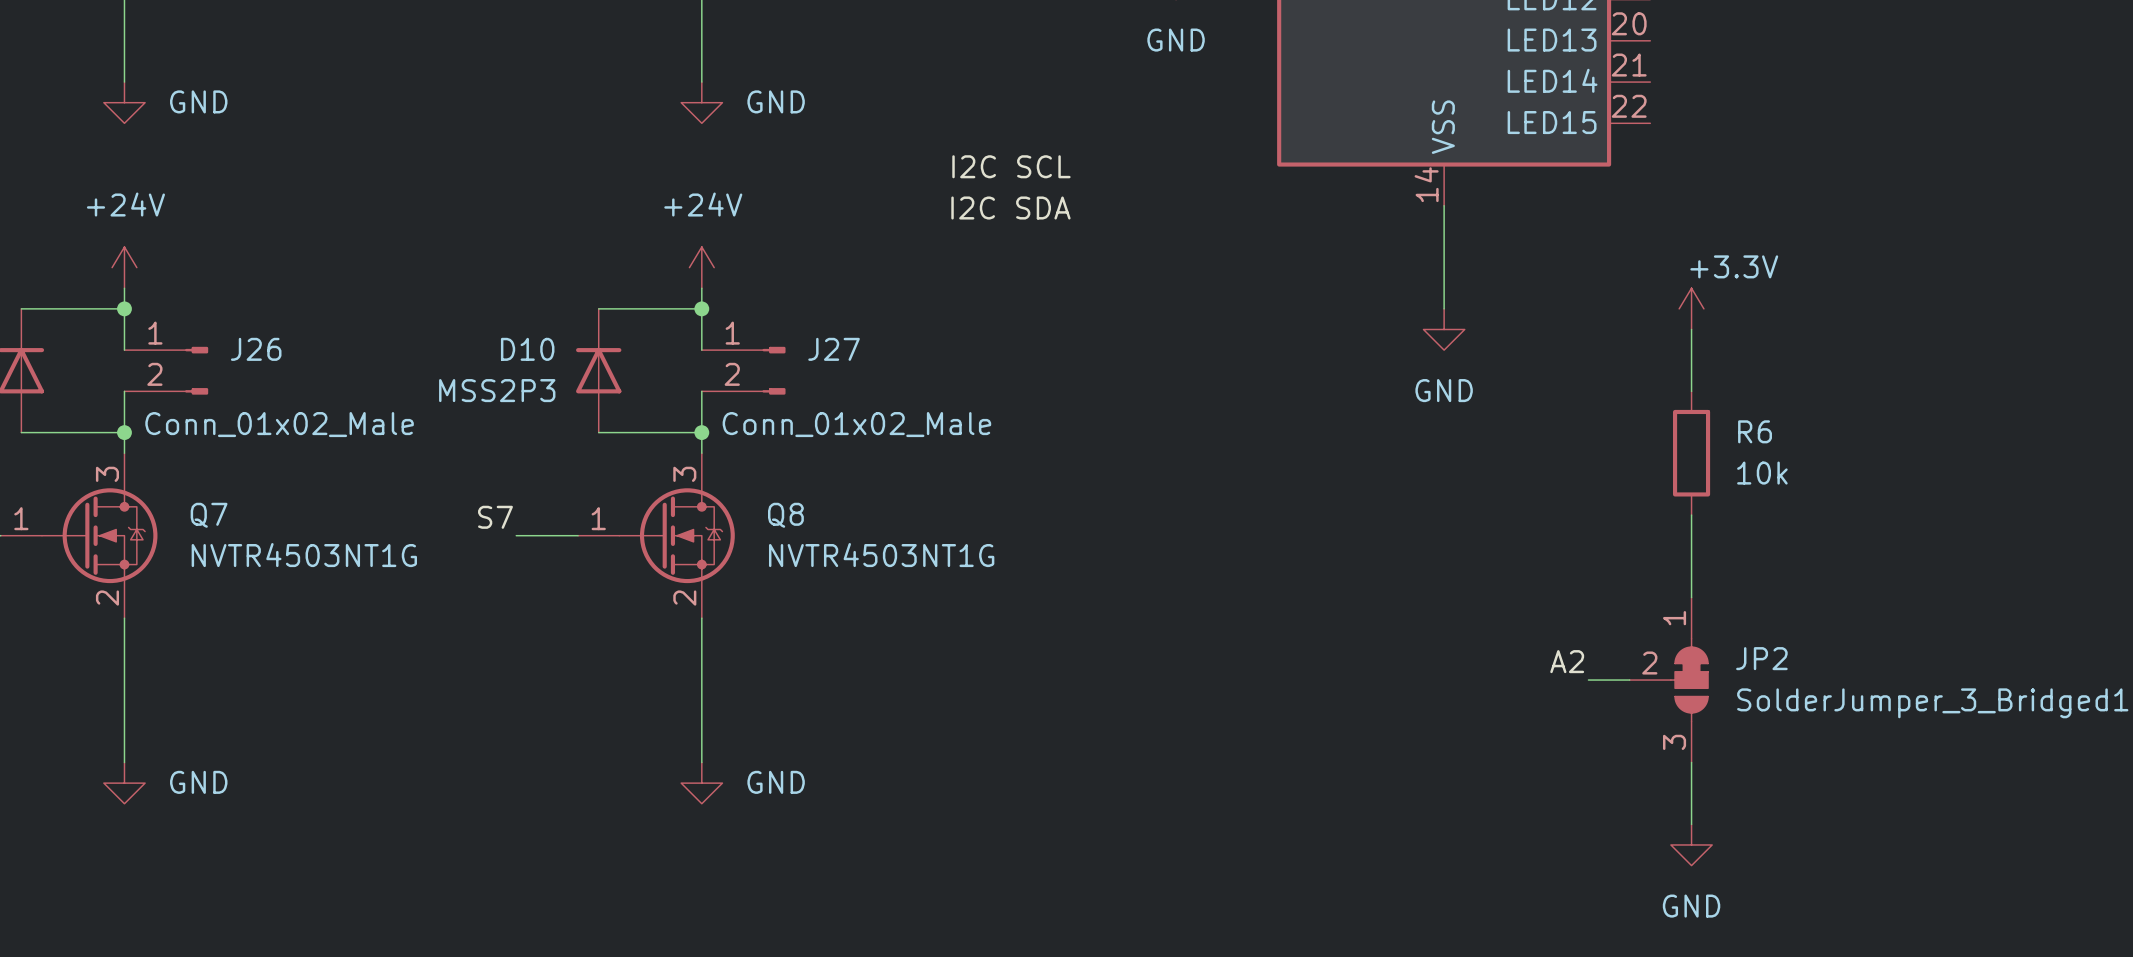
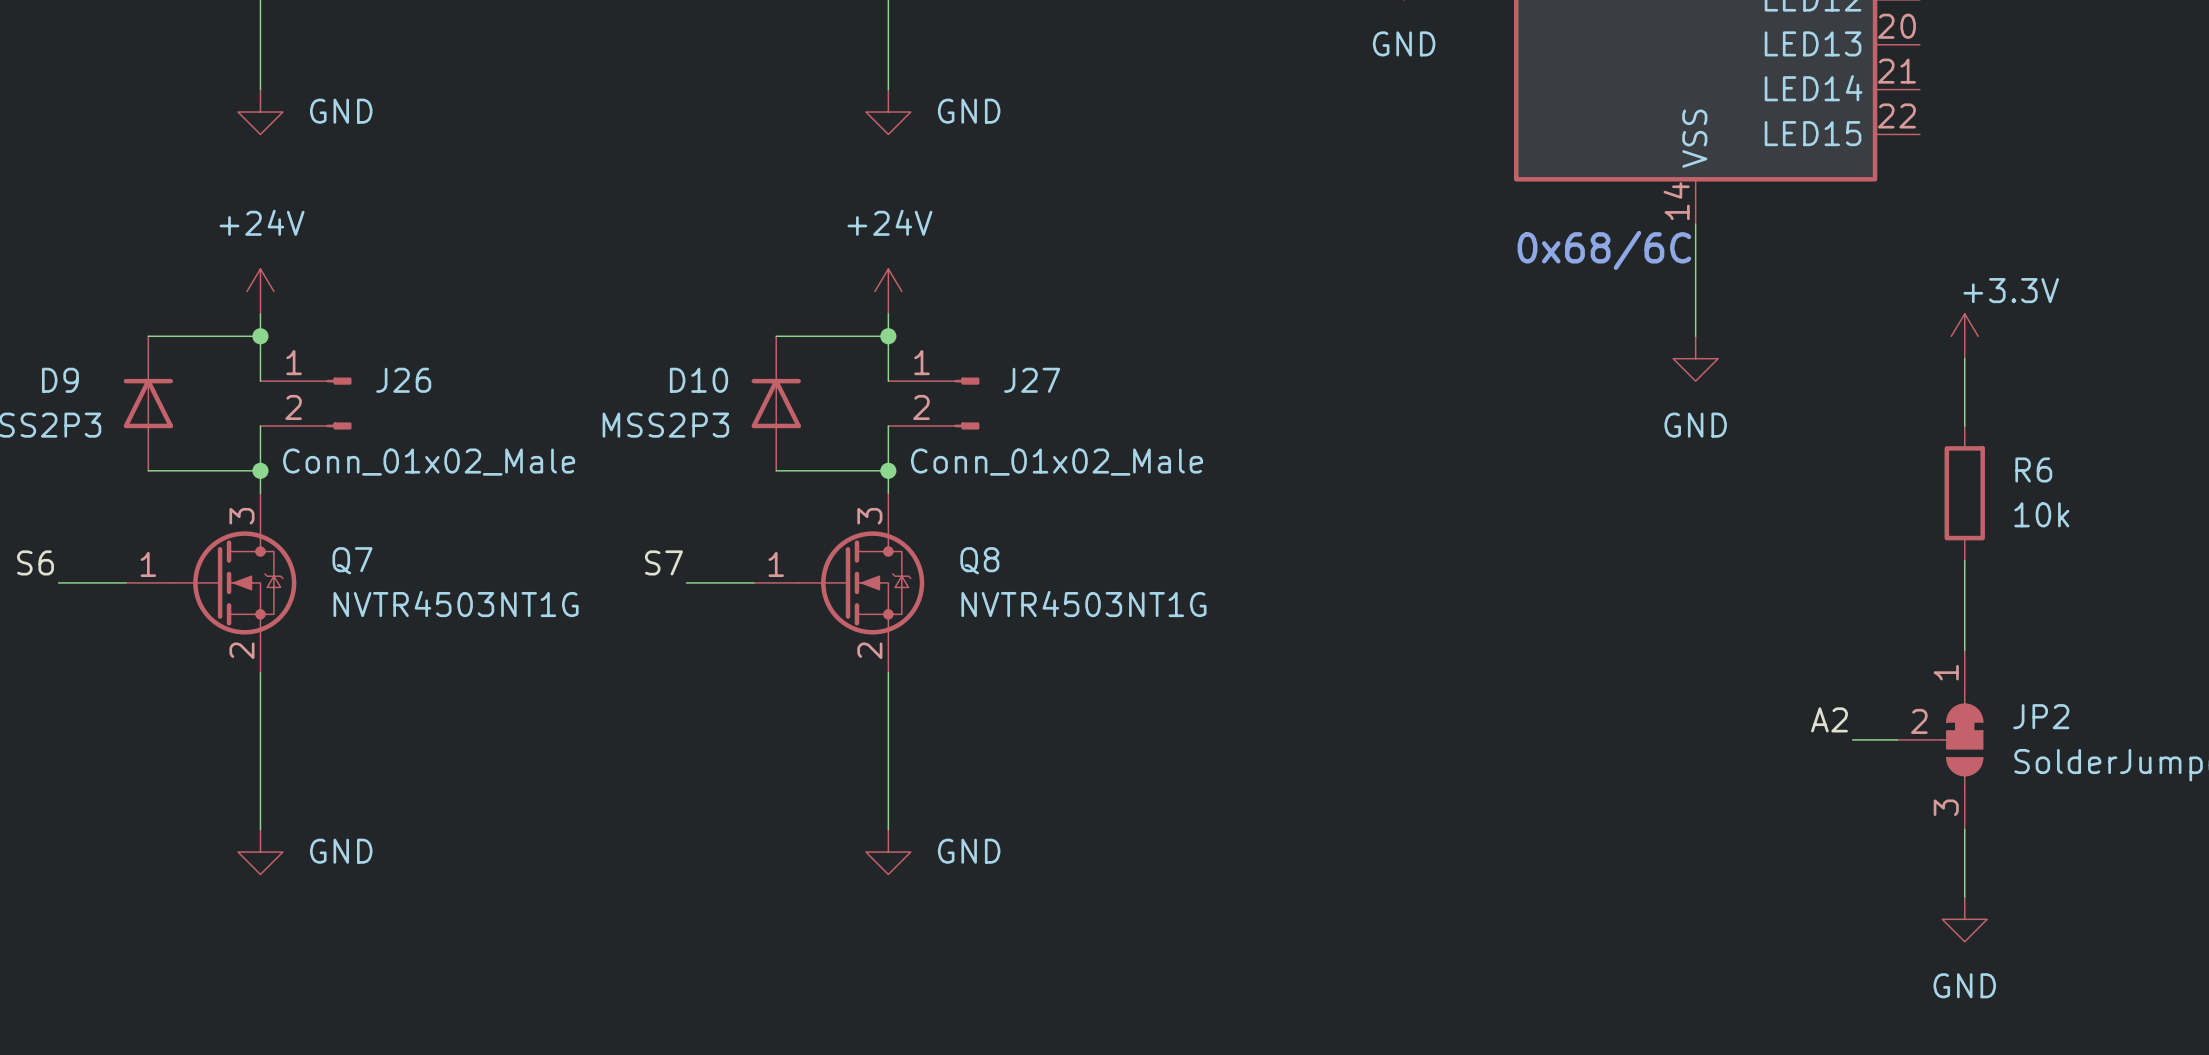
label: I2C SCL (1011, 166) -> none
label: I2C SDA (1010, 208) -> none
text: none -> 0x68/6C (1604, 250)

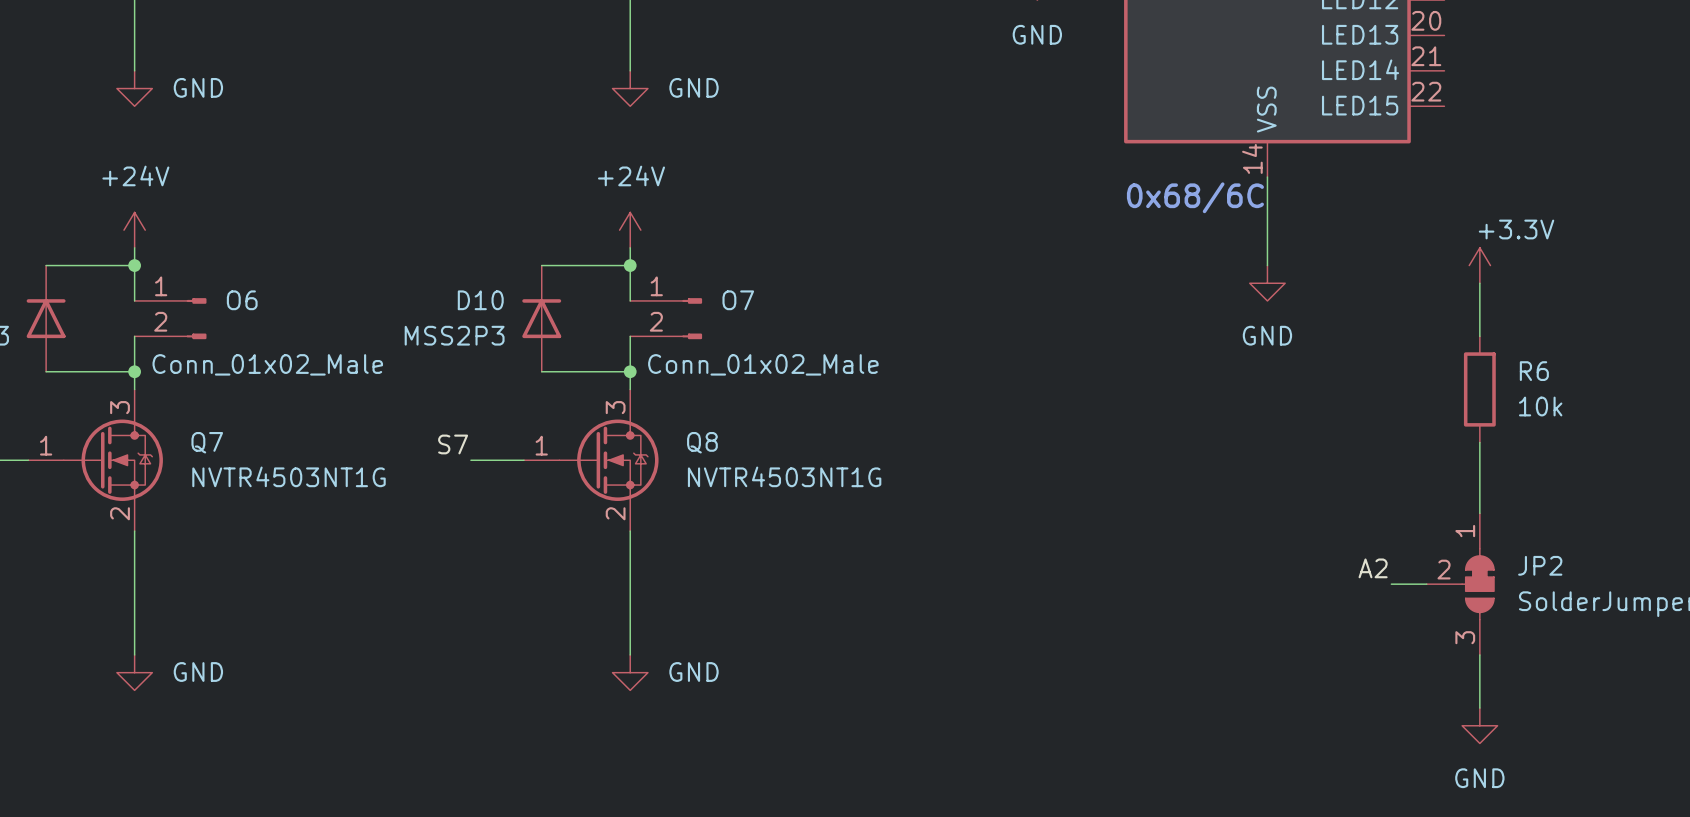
J26 name: J26 (403, 380) -> O6 (242, 300)
J27 name: J27 (1032, 380) -> O7 (738, 300)

